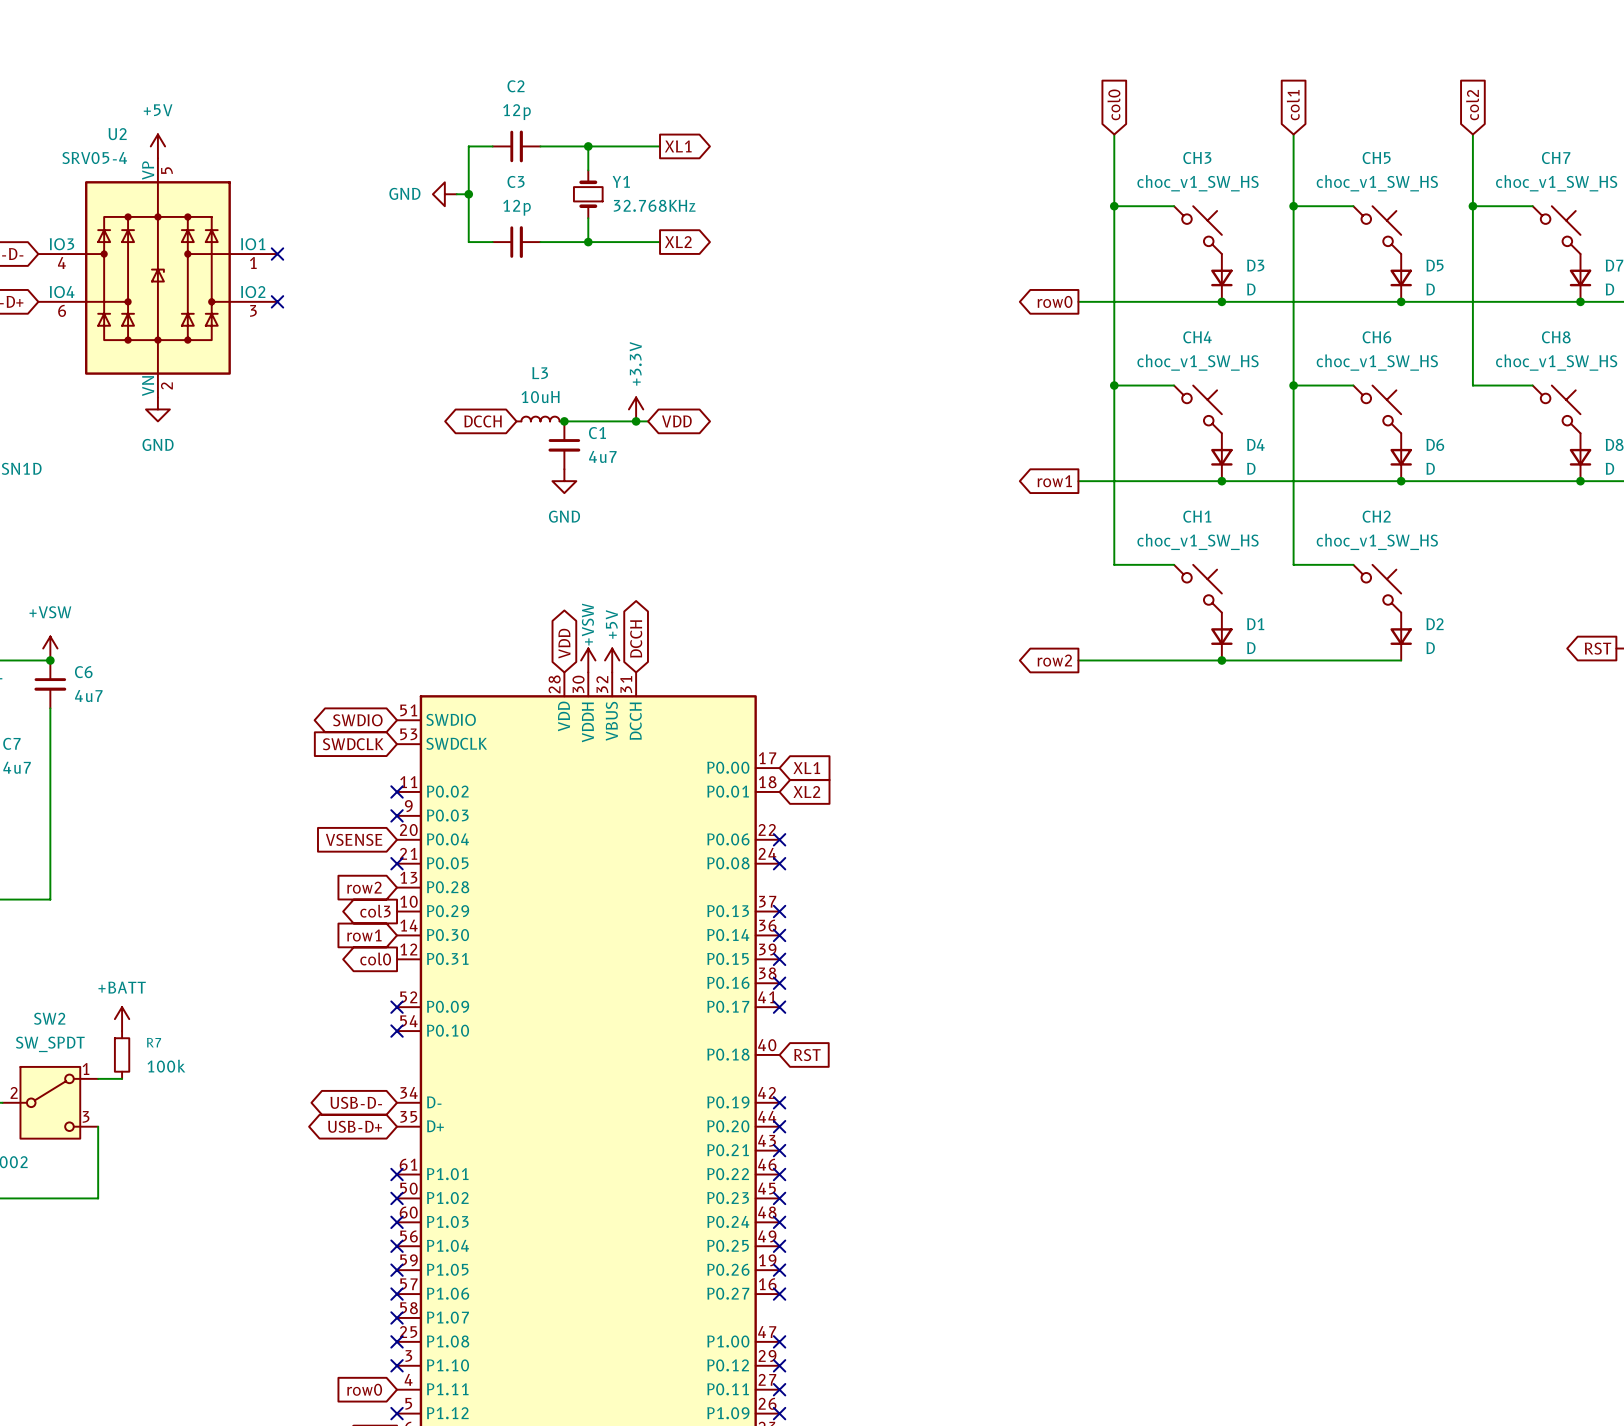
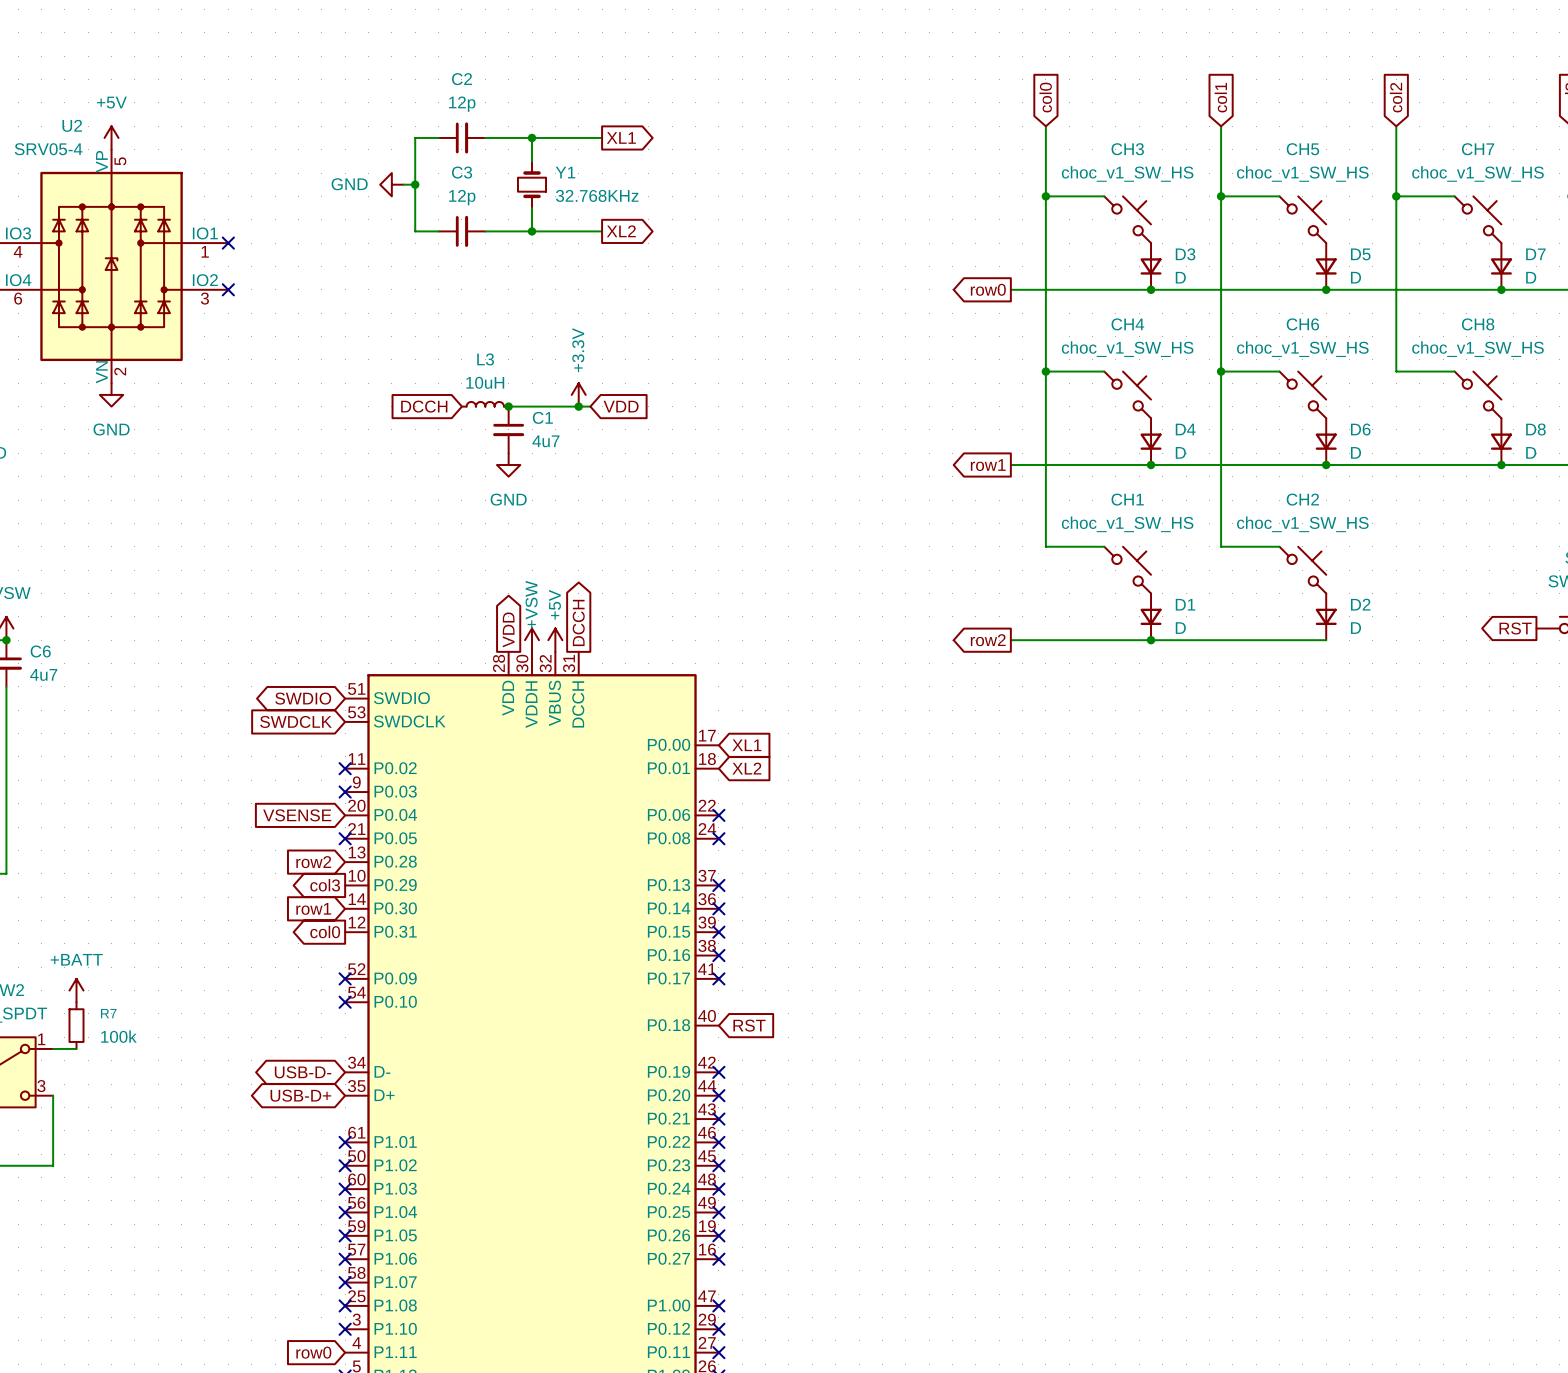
global label shape: bidirectional (483, 421) -> input (424, 406)
global label shape: bidirectional (676, 421) -> input (621, 406)
global label shape: bidirectional (636, 638) -> output (578, 622)
global label shape: bidirectional (564, 643) -> output (508, 629)

